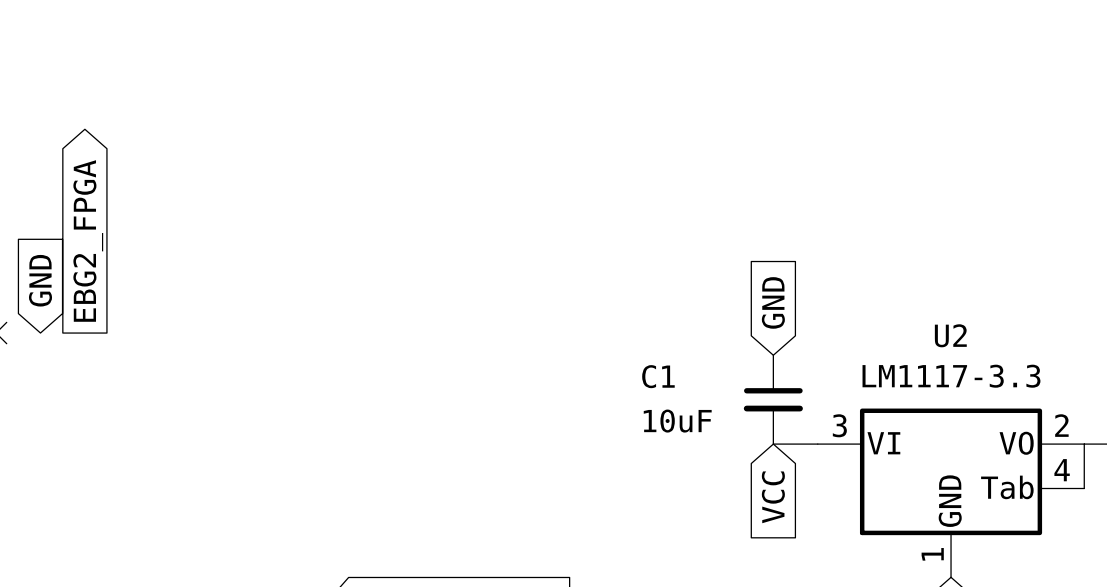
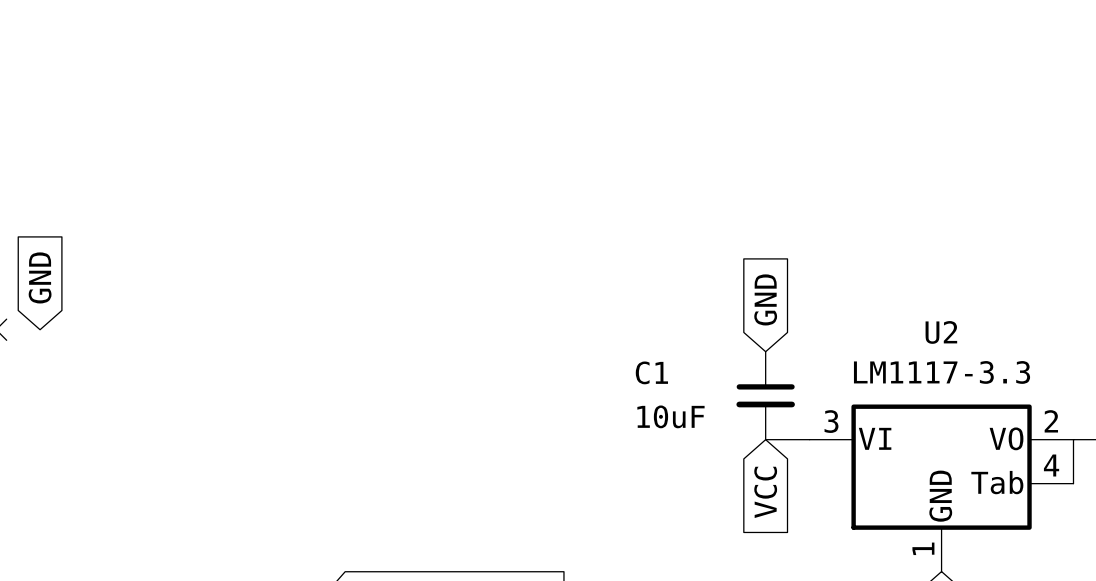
global label: EBG2_FPGA (88, 240) -> none

